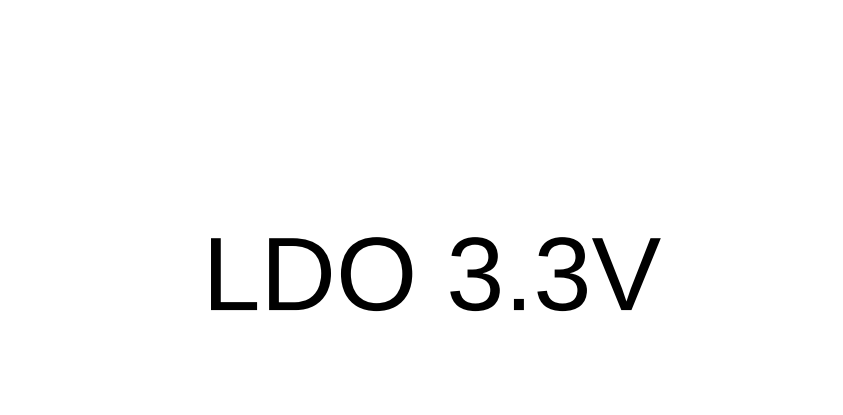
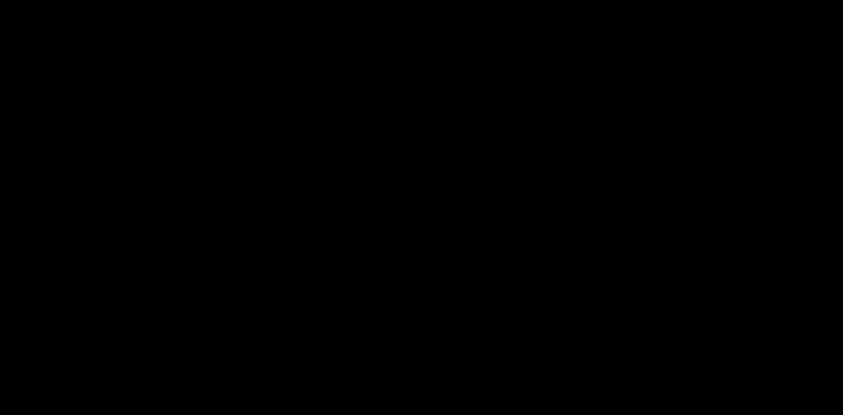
text: LDO 3.3V (435, 274) -> none

